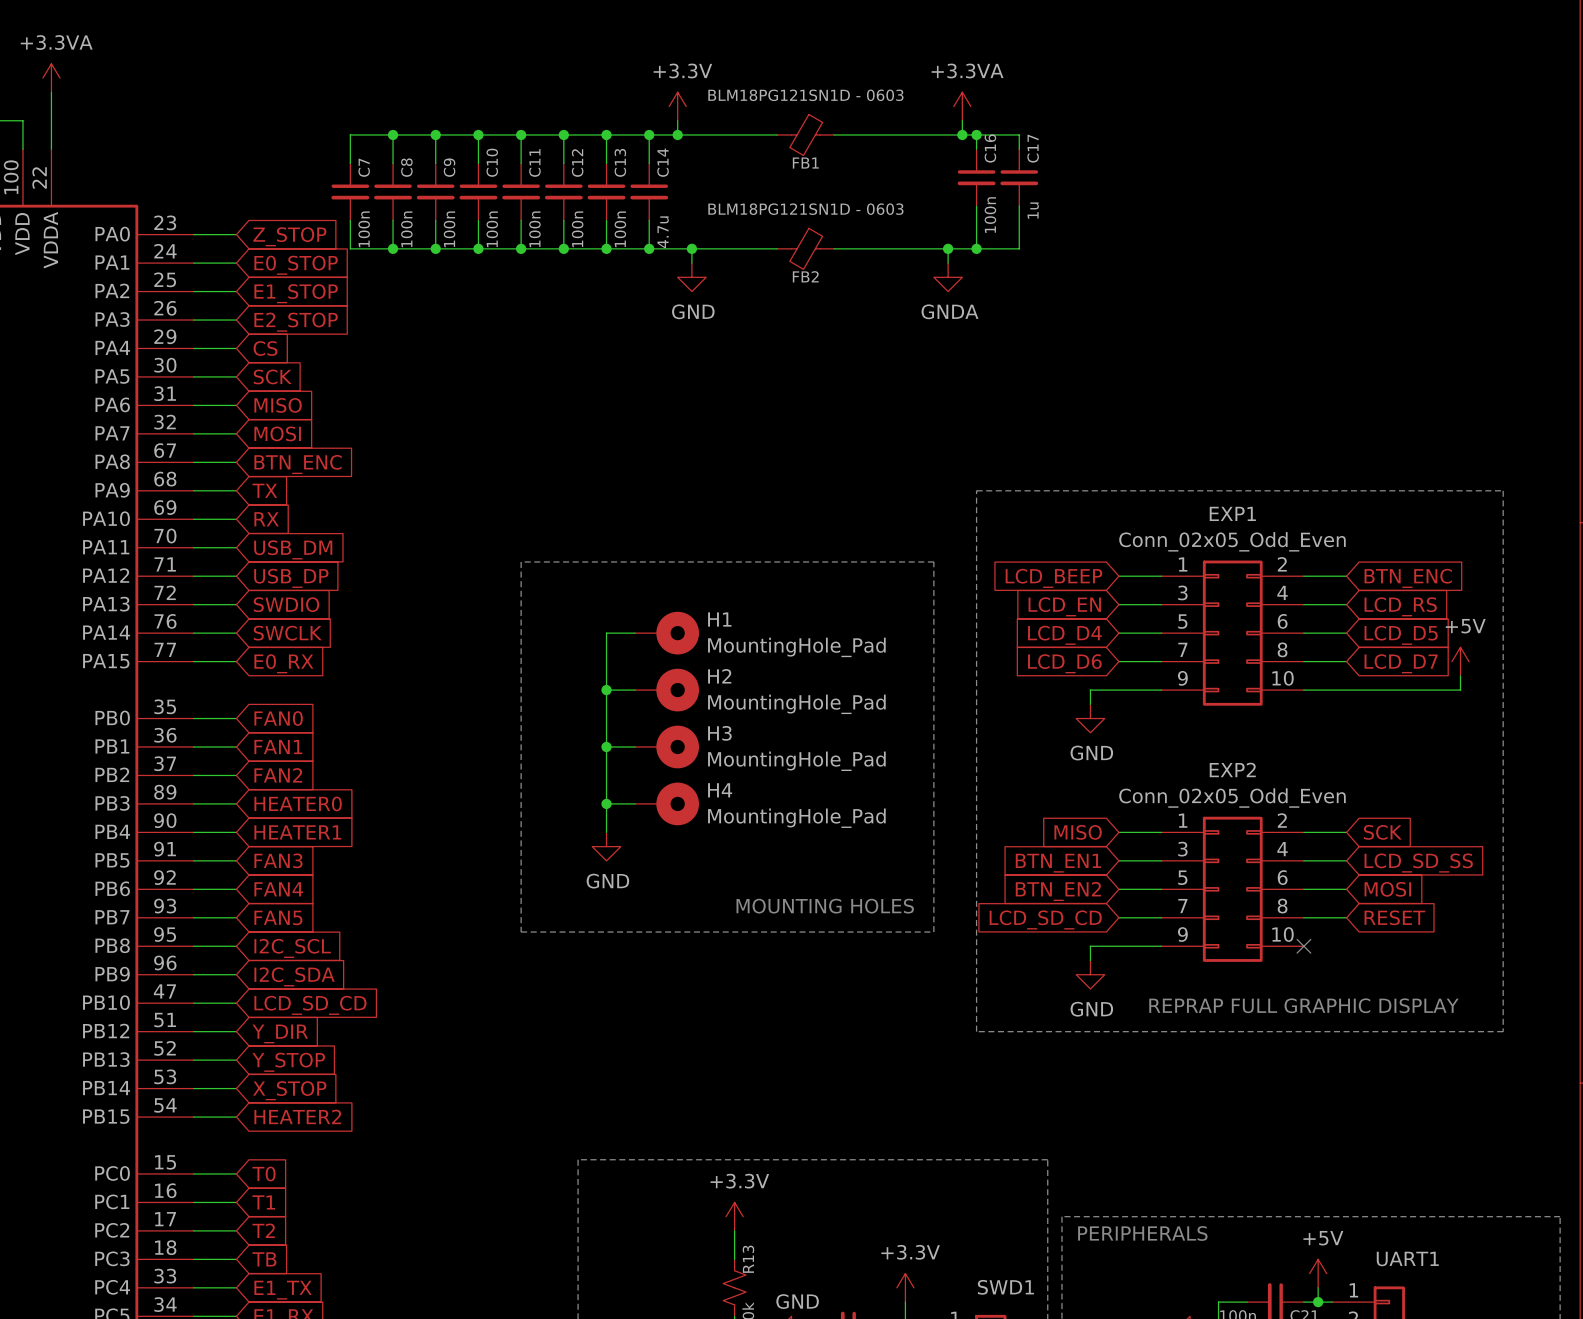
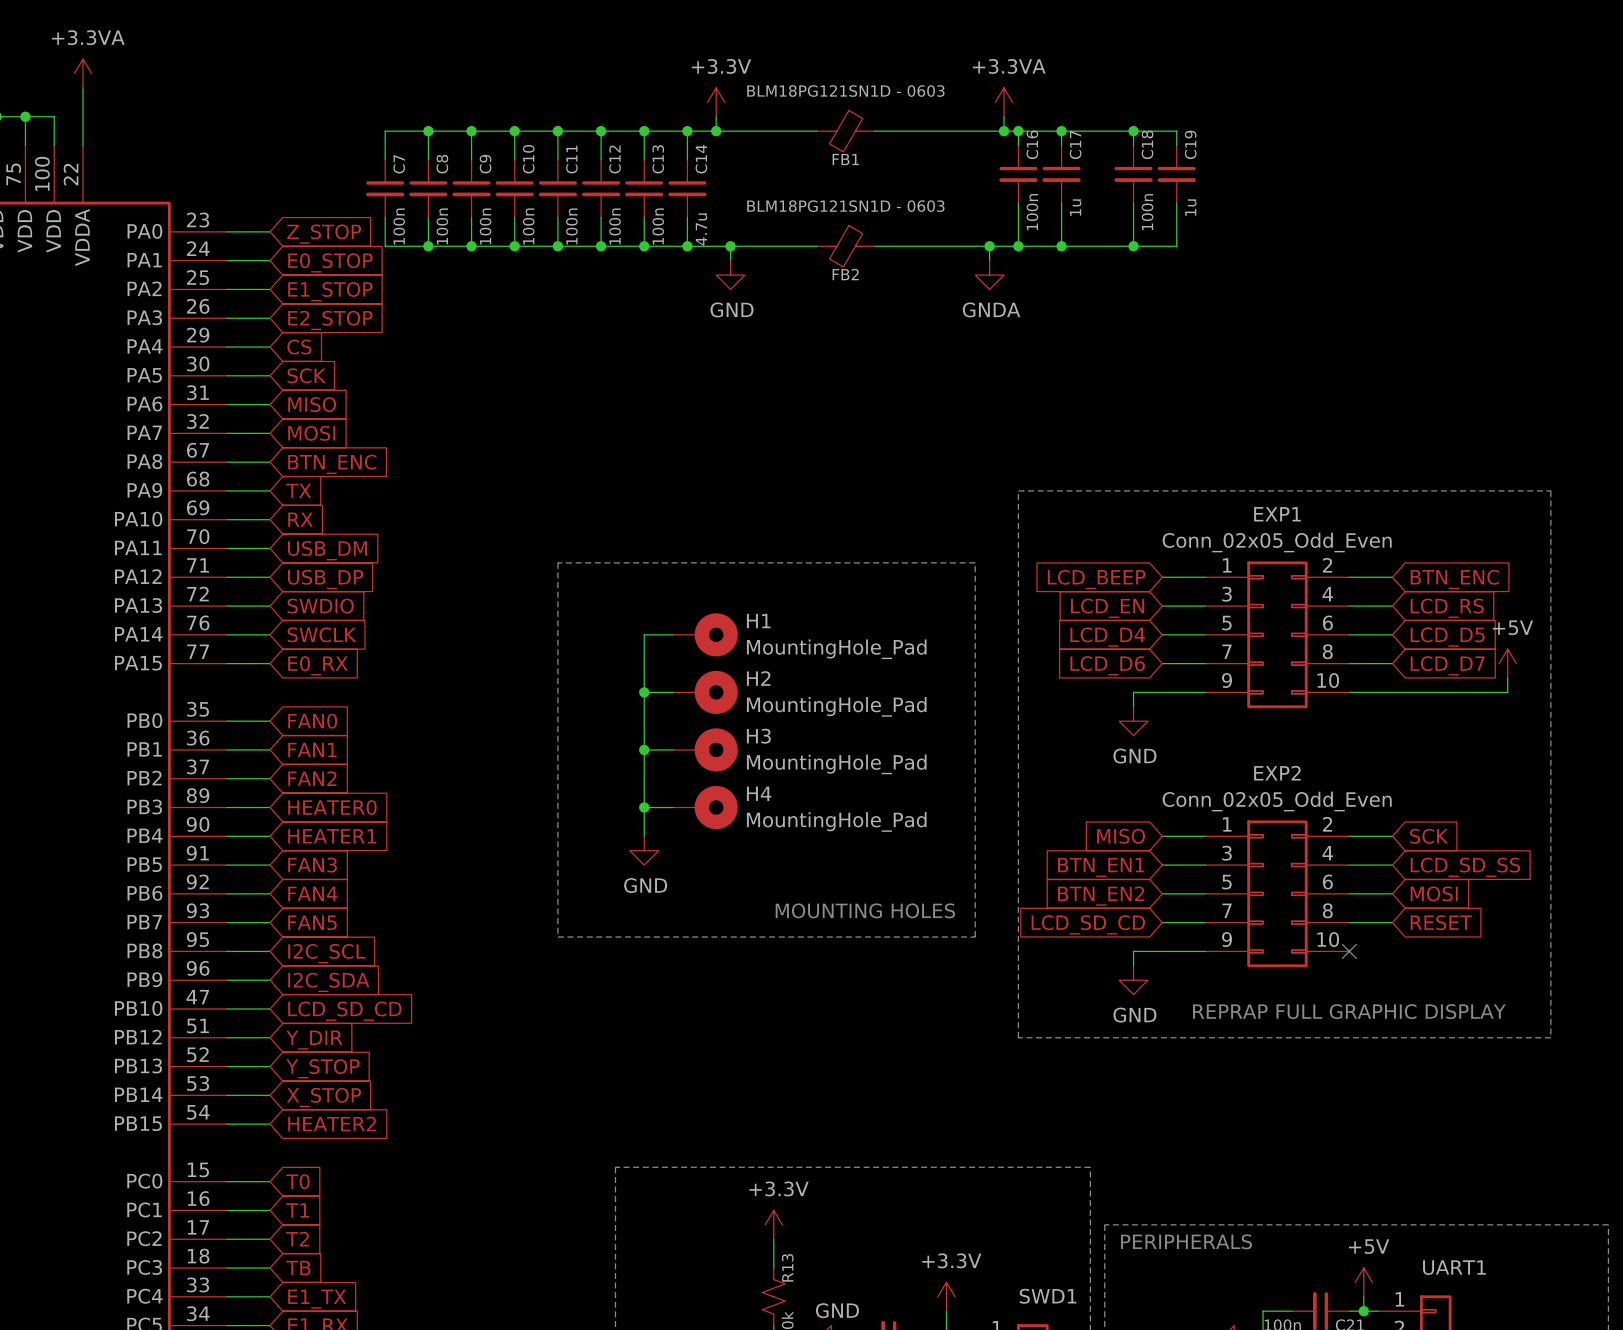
wire: none -> (1061, 131) (1176, 131) (1176, 145)
junction: none -> (1061, 131)
wire: none -> (1133, 131) (1133, 145)
junction: none -> (1133, 131)
C18: none -> 100n (1133, 174)
C19: none -> 1u (1176, 174)
wire: none -> (1133, 203) (1133, 246)
wire: none -> (1176, 203) (1176, 246) (1061, 246)
junction: none -> (1061, 246)
junction: none -> (1133, 246)

